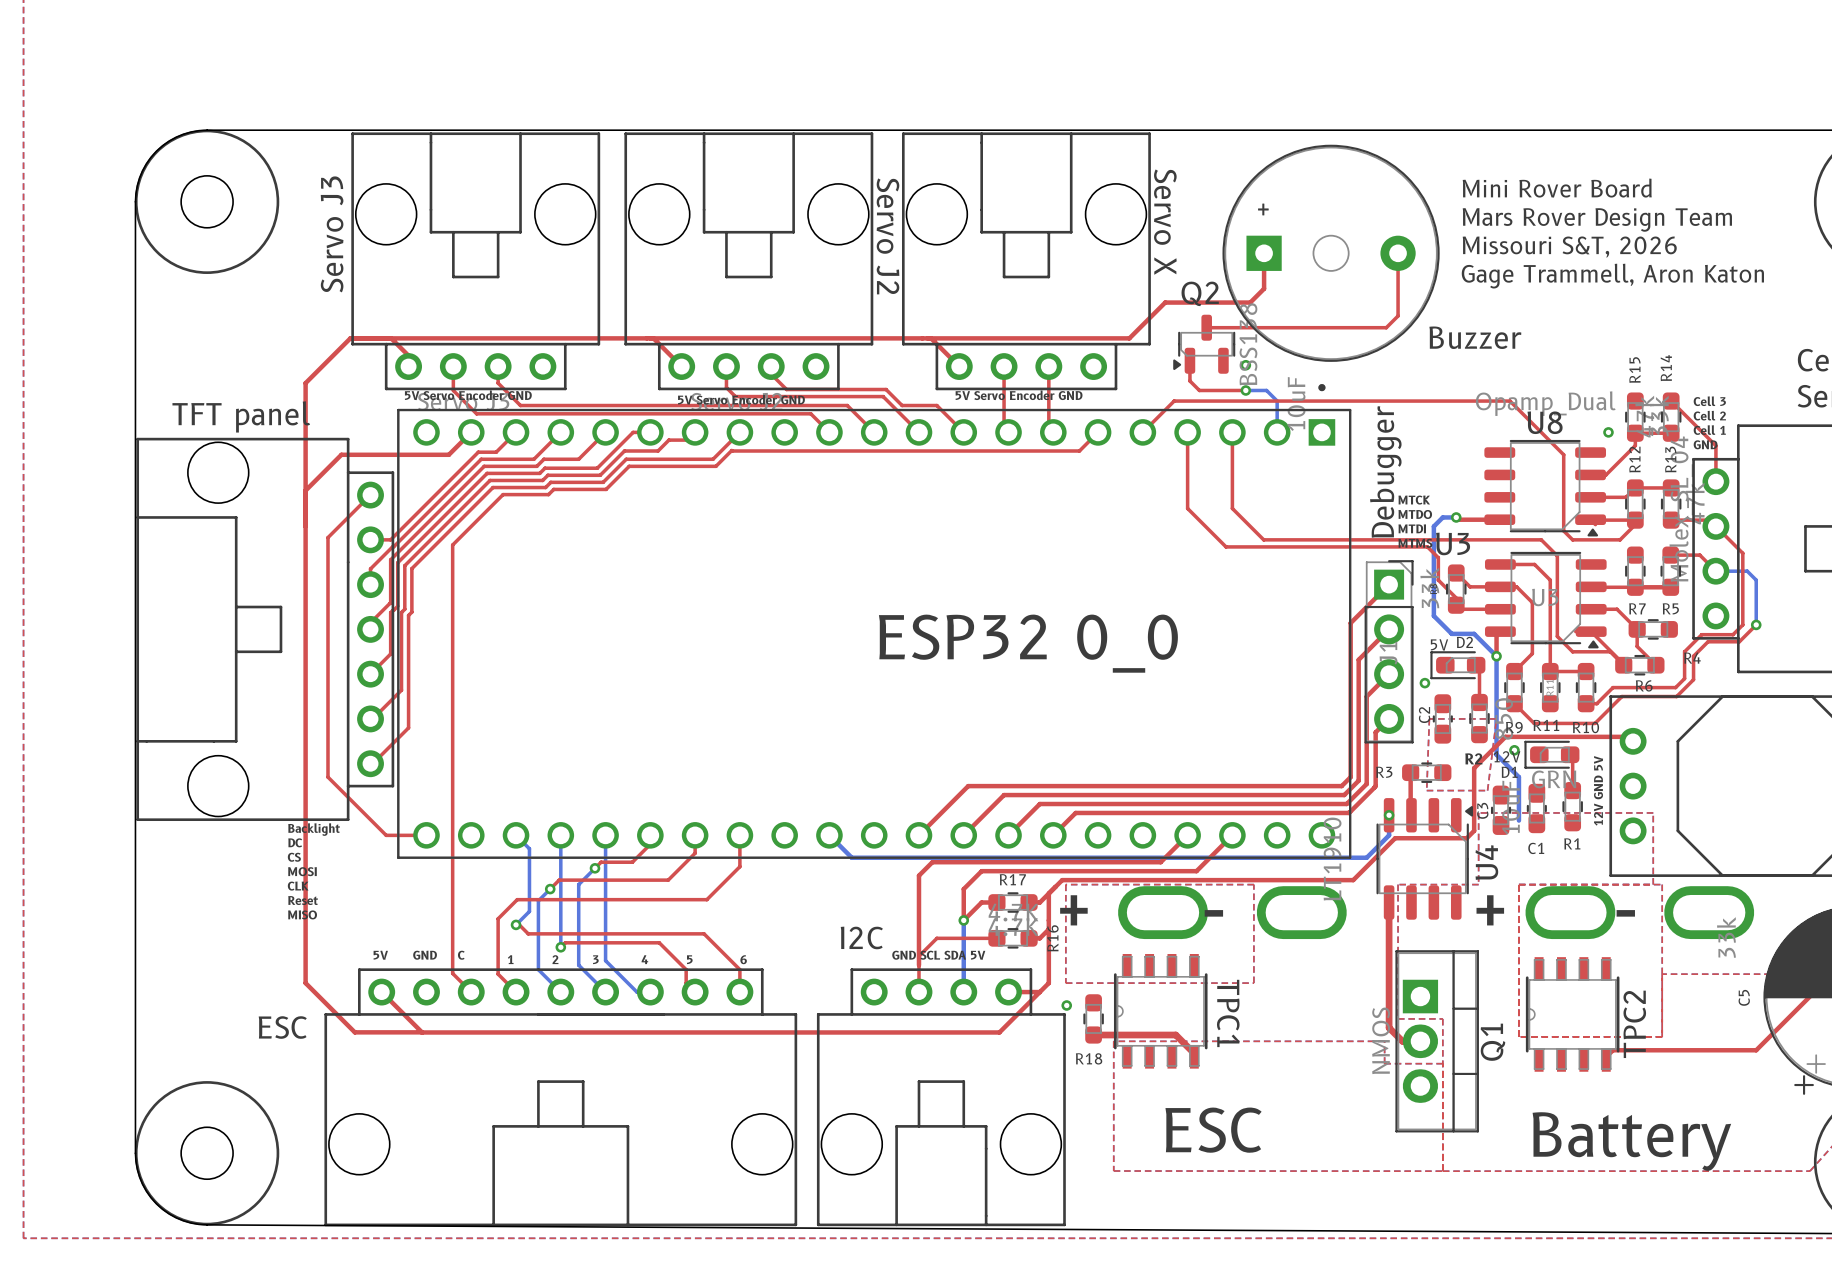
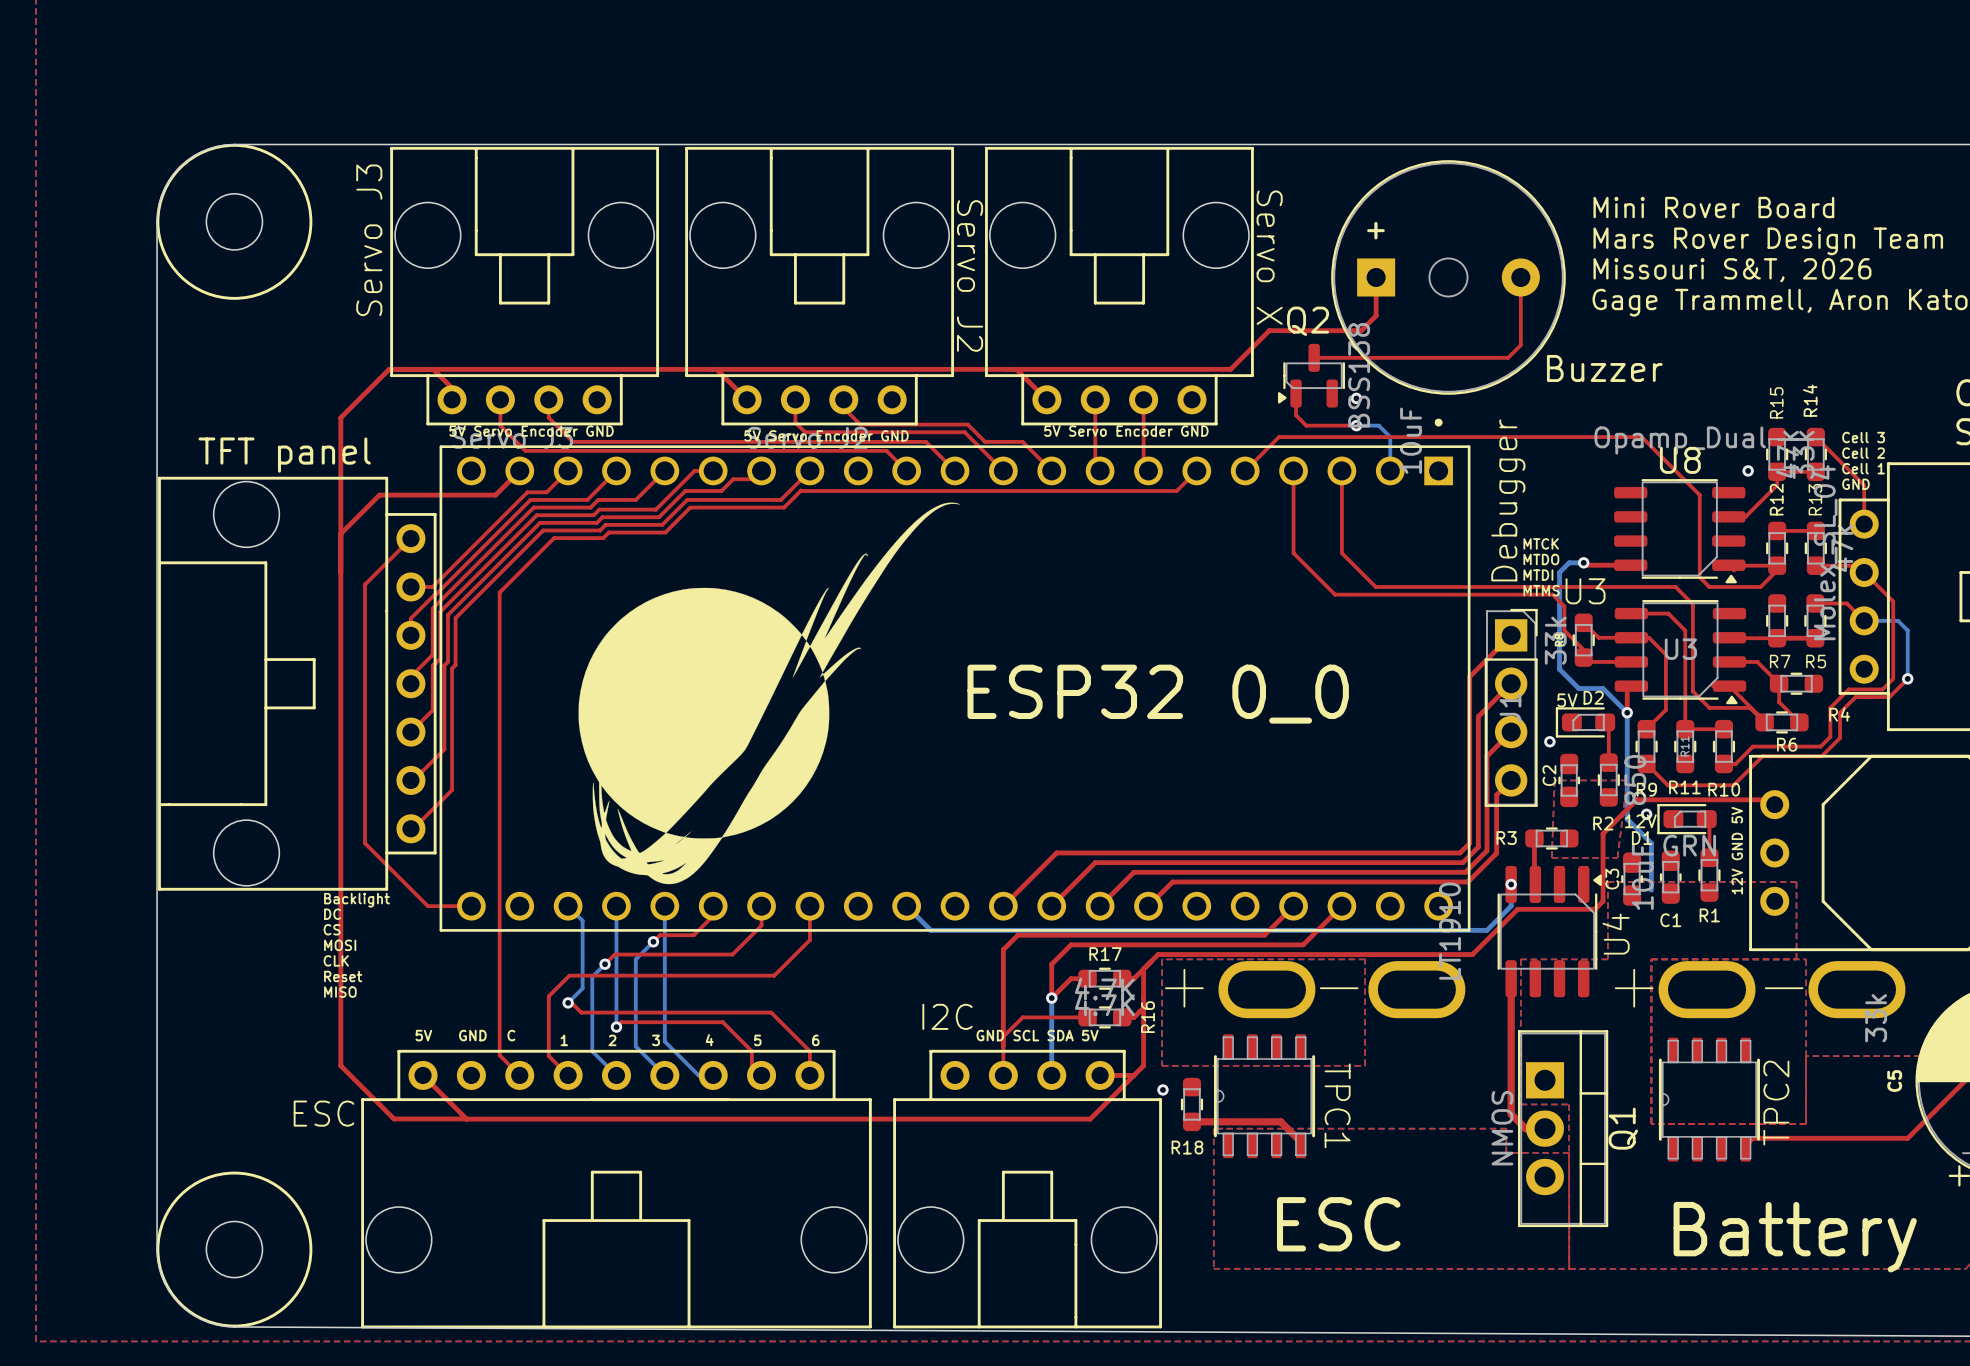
drawing: none -> [578, 502, 961, 885]
top track: (1630, 492) (1625, 497) (1590, 497) -> none

